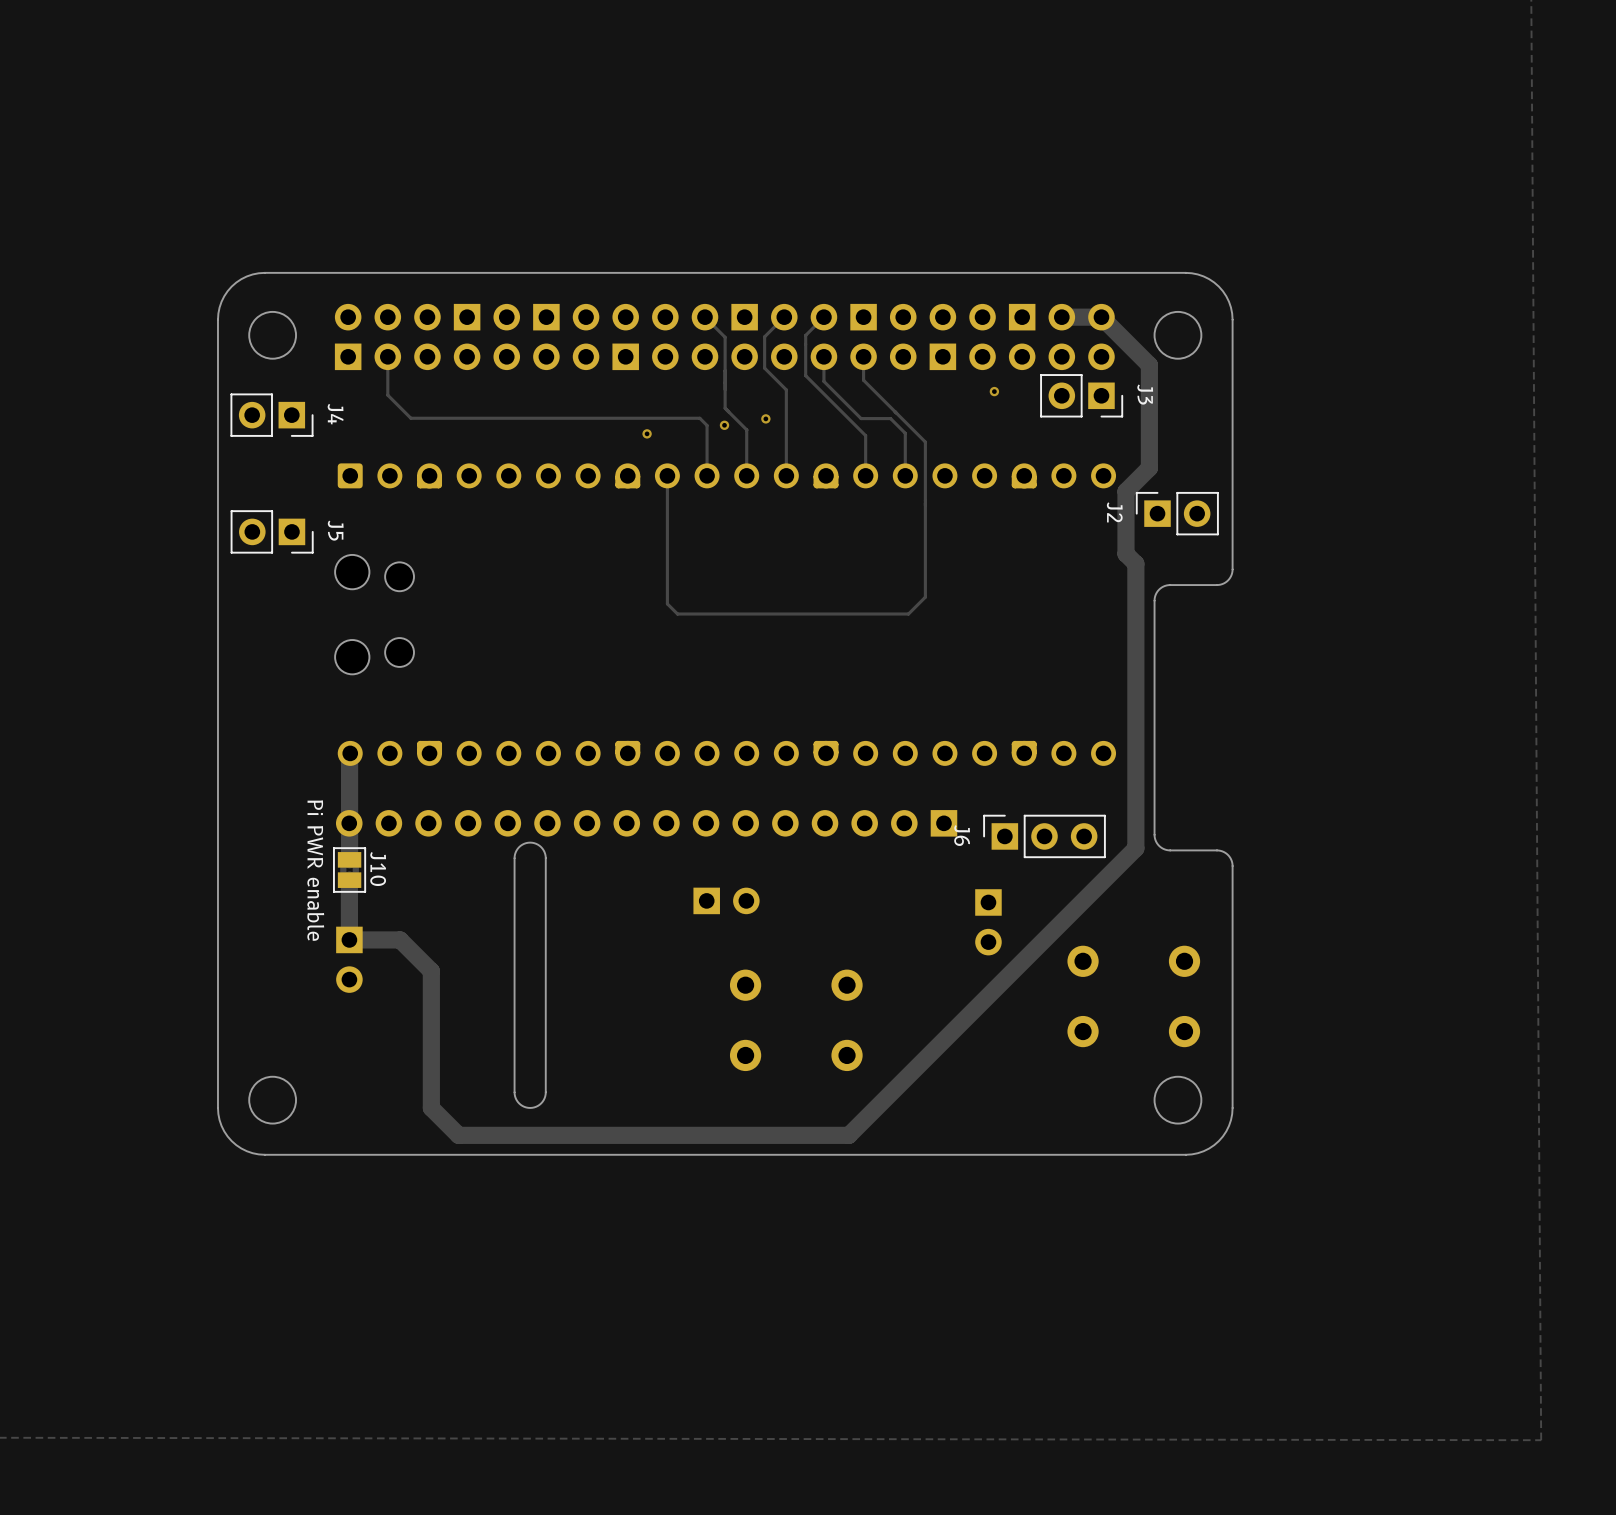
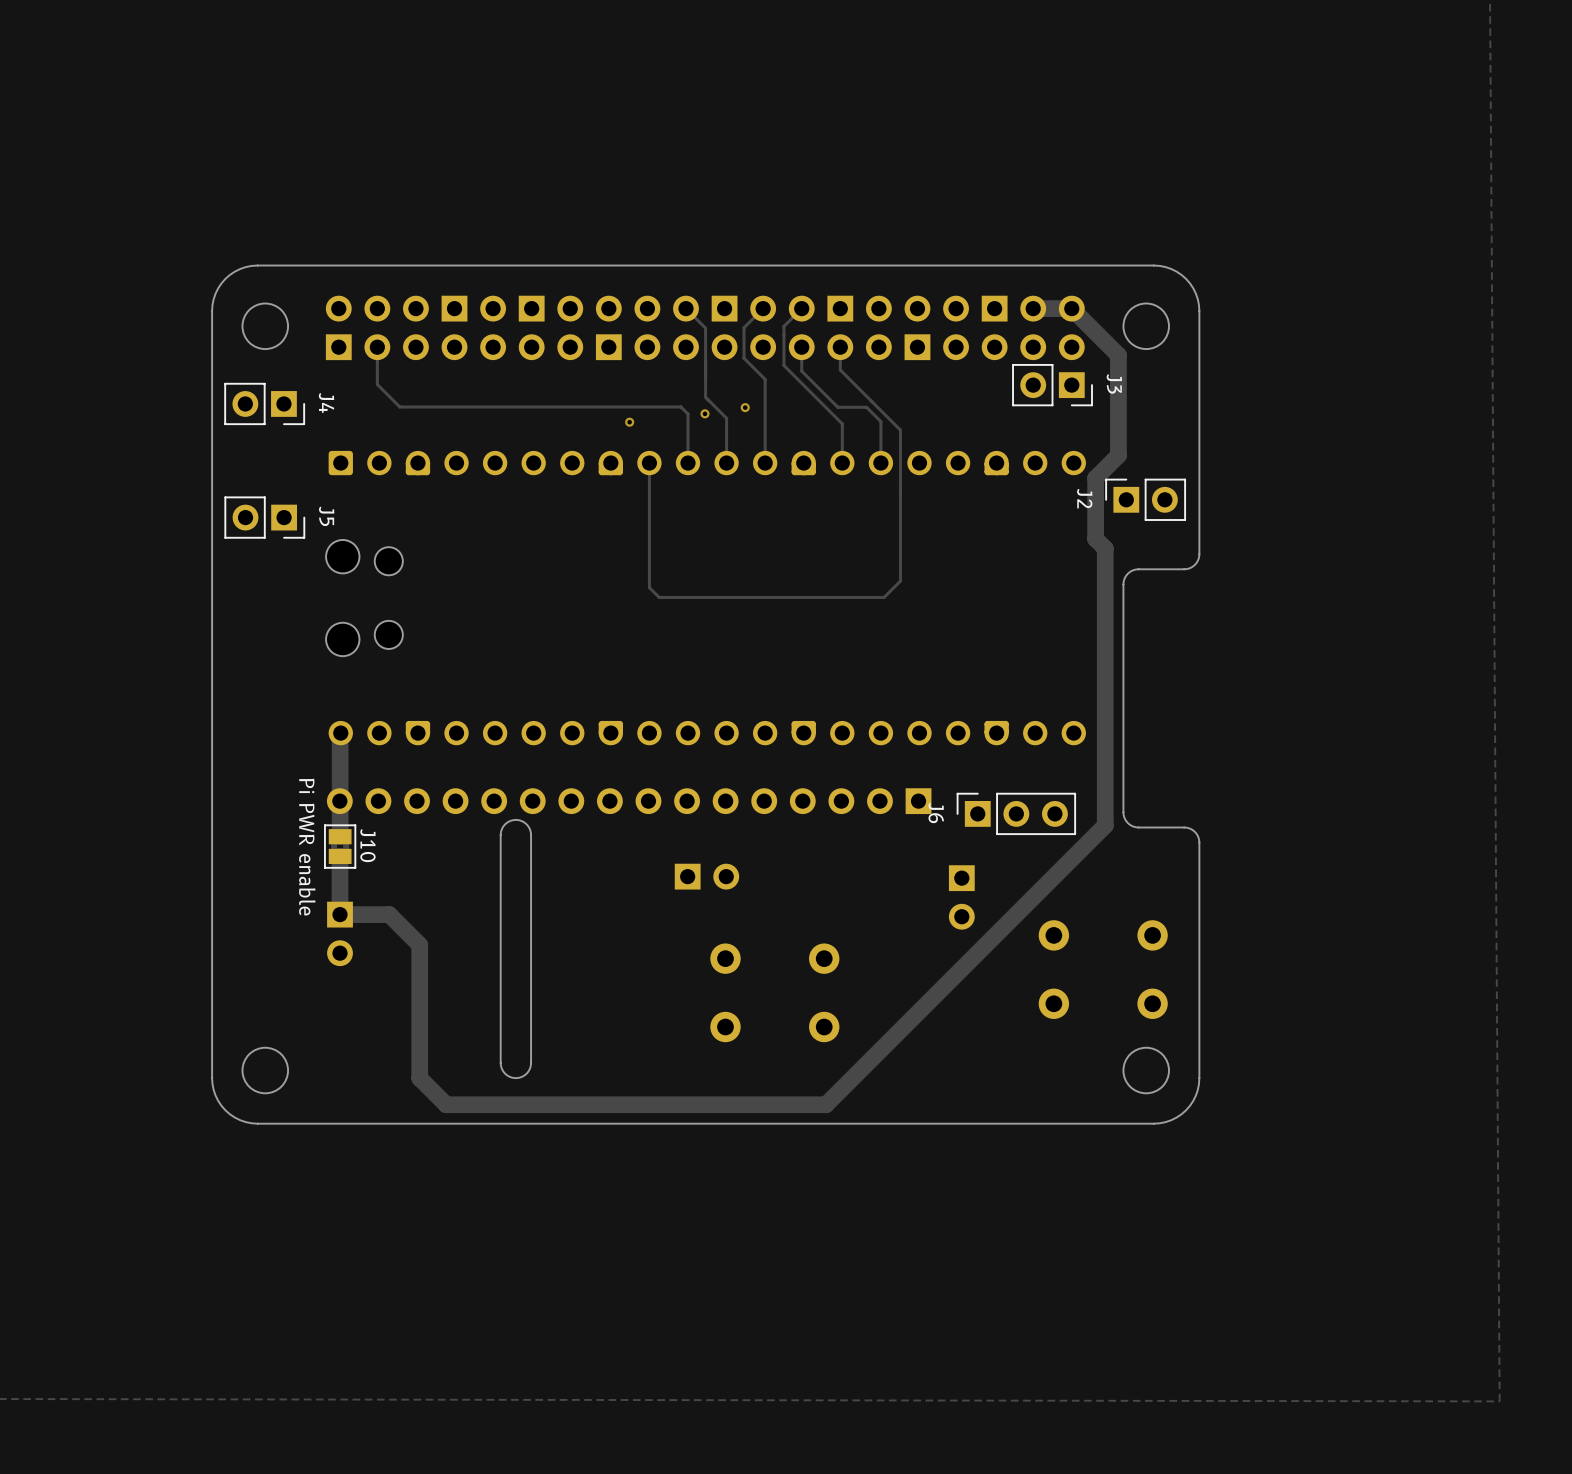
via: (994, 391) -> none

